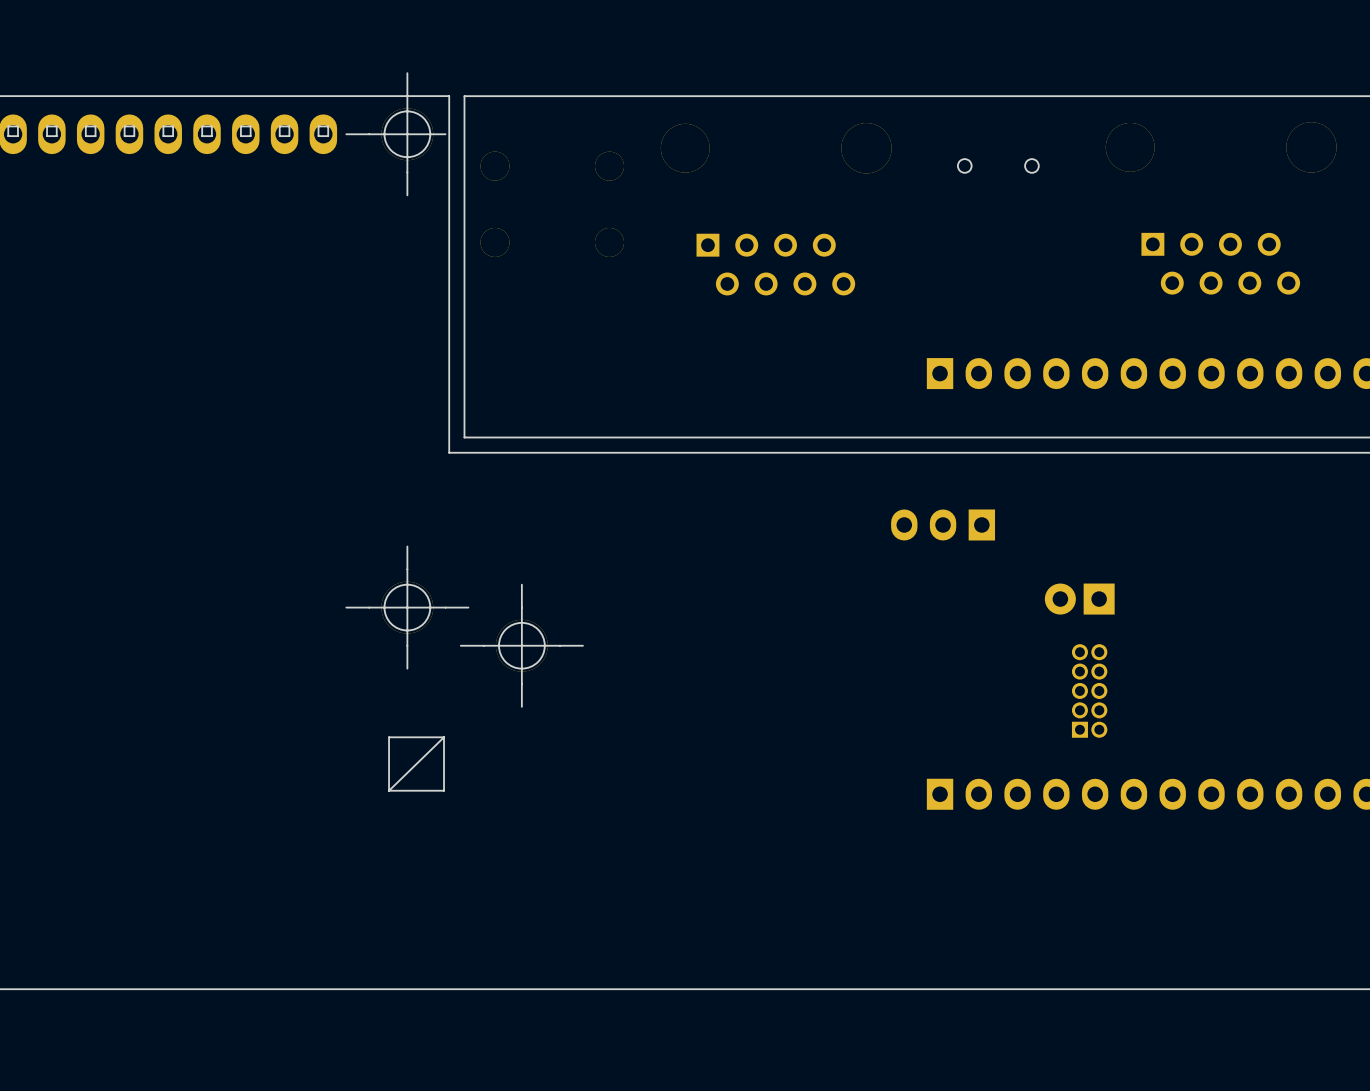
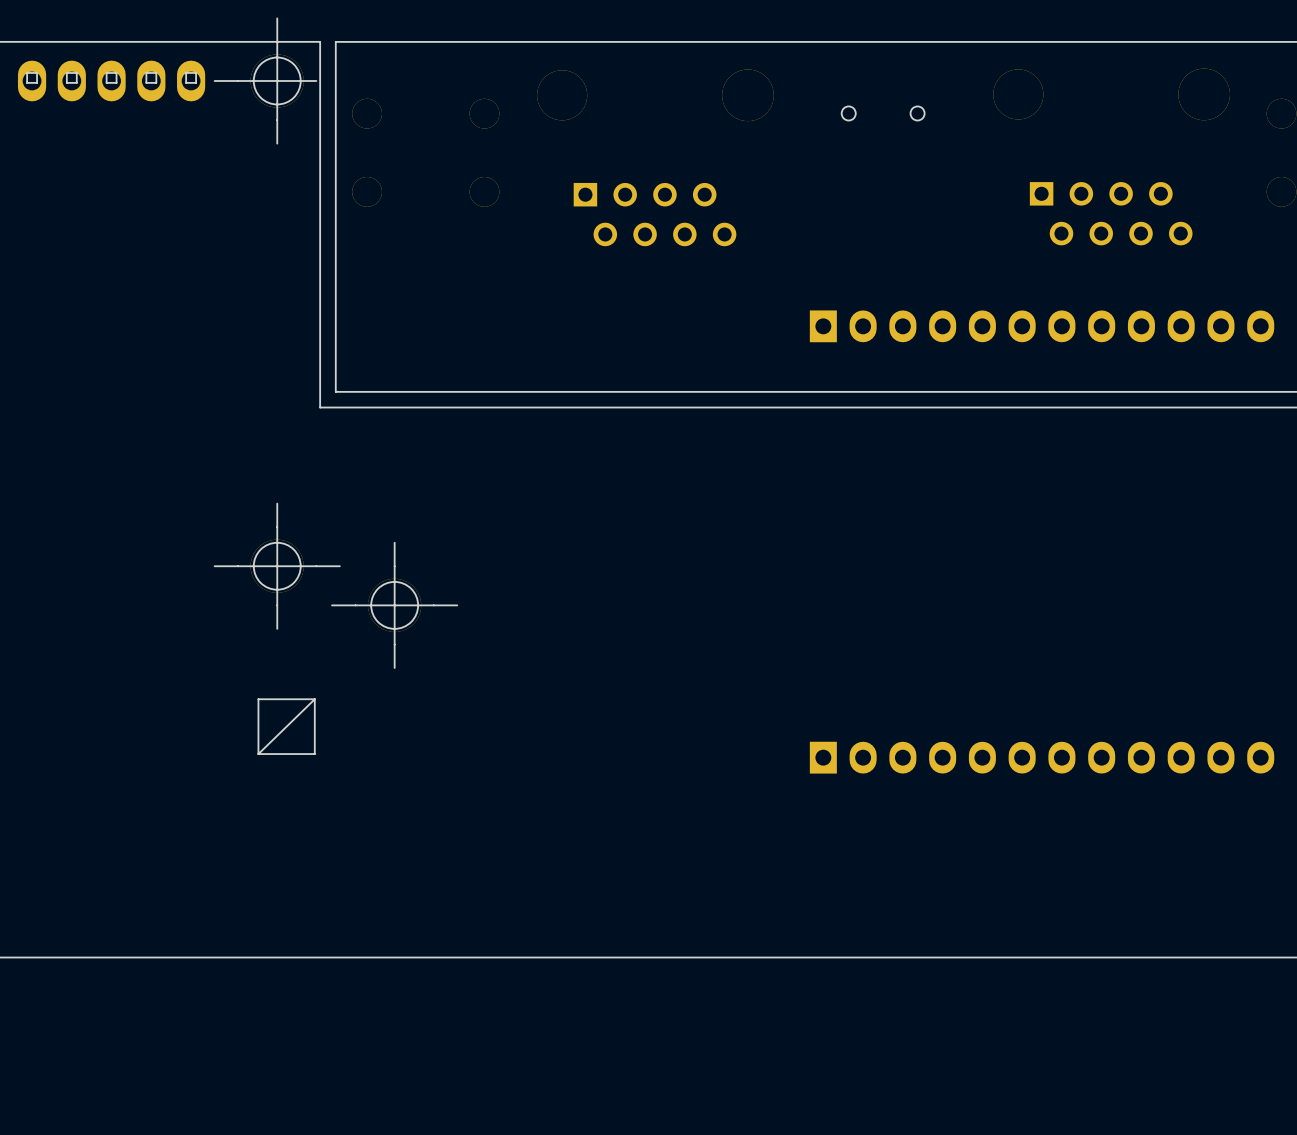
part: (943, 524) -> none
part: (1079, 599) -> none
part: (1089, 690) -> none

